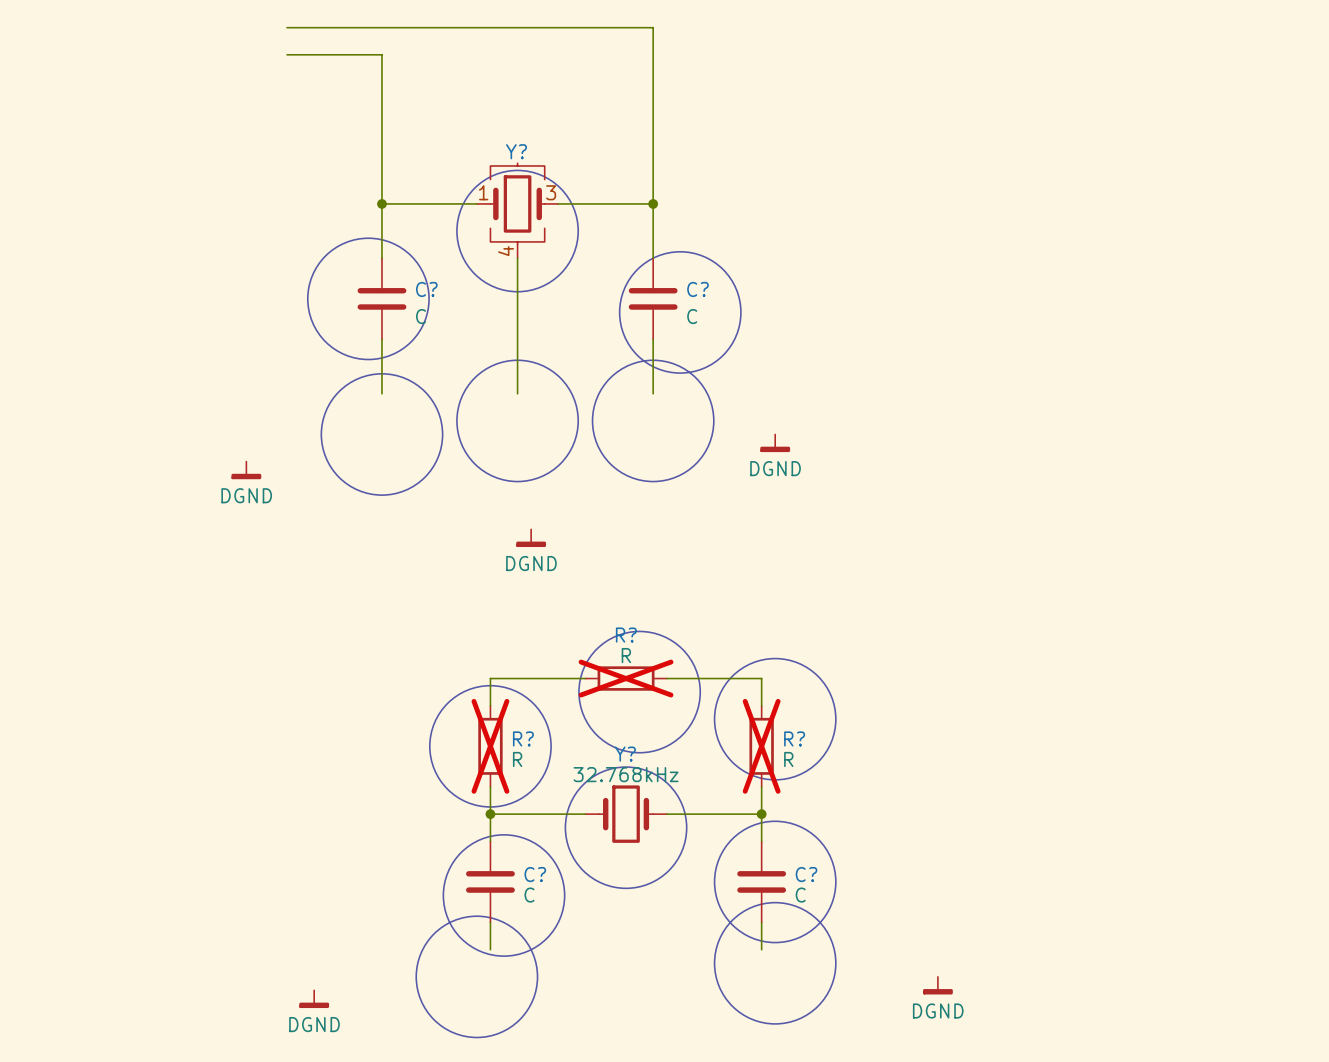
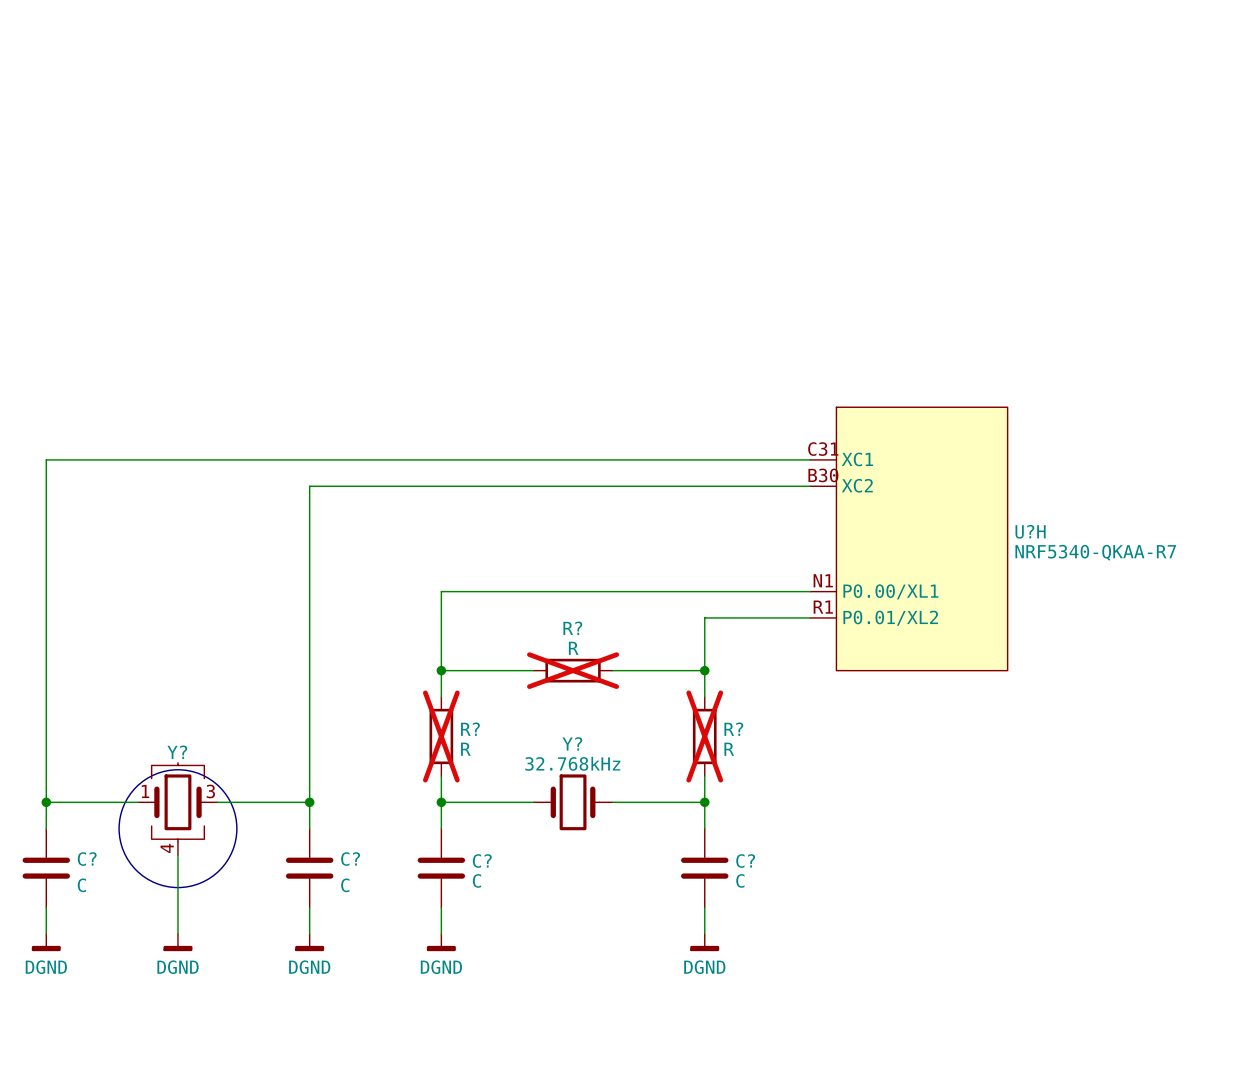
wire: (287, 27) (653, 27) (653, 258) -> none
wire: (287, 54) (381, 54) (381, 258) -> none
drawing: [456, 170, 579, 292] -> none
wire: (381, 203) (476, 203) -> none
junction: (381, 203) -> none
wire: (558, 203) (653, 203) -> none
junction: (653, 203) -> none
Y?: (517, 210) -> none
drawing: [307, 238, 430, 360] -> none
drawing: [592, 251, 741, 482] -> none
wire: (517, 258) (517, 393) -> none
C?: C (381, 298) -> none
C?: C (653, 298) -> none
wire: (381, 339) (381, 393) -> none
wire: (653, 339) (653, 393) -> none
drawing: [456, 360, 579, 482] -> none
drawing: [321, 373, 443, 496] -> none
power symbol: DGND (775, 443) -> none
wire: none -> (810, 459) (46, 459) (46, 828)
power symbol: DGND (246, 470) -> none
wire: none -> (810, 486) (309, 486) (309, 828)
power symbol: DGND (531, 538) -> none
U?H: none -> NRF5340-QKAA-R7 (908, 538)
wire: none -> (810, 591) (441, 591) (441, 670)
wire: none -> (810, 617) (704, 617) (704, 670)
drawing: [578, 631, 701, 753] -> none
drawing: [714, 658, 836, 780] -> none
junction: none -> (441, 670)
junction: none -> (704, 670)
drawing: [429, 685, 552, 807] -> none
drawing: [416, 767, 687, 1038] -> none
drawing: none -> [119, 769, 237, 888]
wire: none -> (46, 802) (138, 802)
junction: none -> (46, 802)
wire: none -> (217, 802) (309, 802)
junction: none -> (309, 802)
Y?: none -> (177, 808)
drawing: [714, 821, 836, 1024] -> none
wire: none -> (177, 855) (177, 934)
C?: none -> C (46, 868)
C?: none -> C (309, 868)
wire: none -> (46, 907) (46, 934)
wire: none -> (309, 907) (309, 934)
power symbol: none -> DGND (46, 942)
power symbol: none -> DGND (177, 942)
power symbol: none -> DGND (309, 942)
power symbol: none -> DGND (441, 942)
power symbol position: DGND (937, 985) -> DGND (704, 942)
power symbol: DGND (314, 999) -> none

